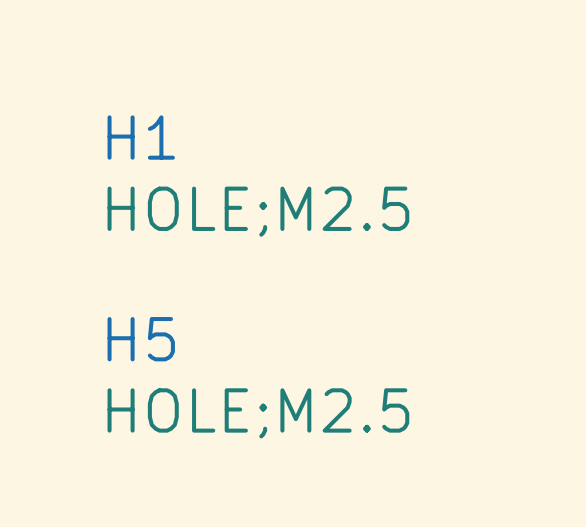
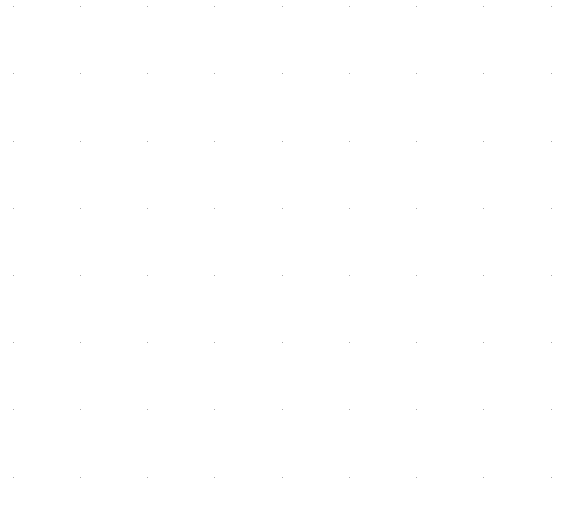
H1: HOLE;M2.5 (258, 176) -> none
H5: HOLE;M2.5 (258, 377) -> none

